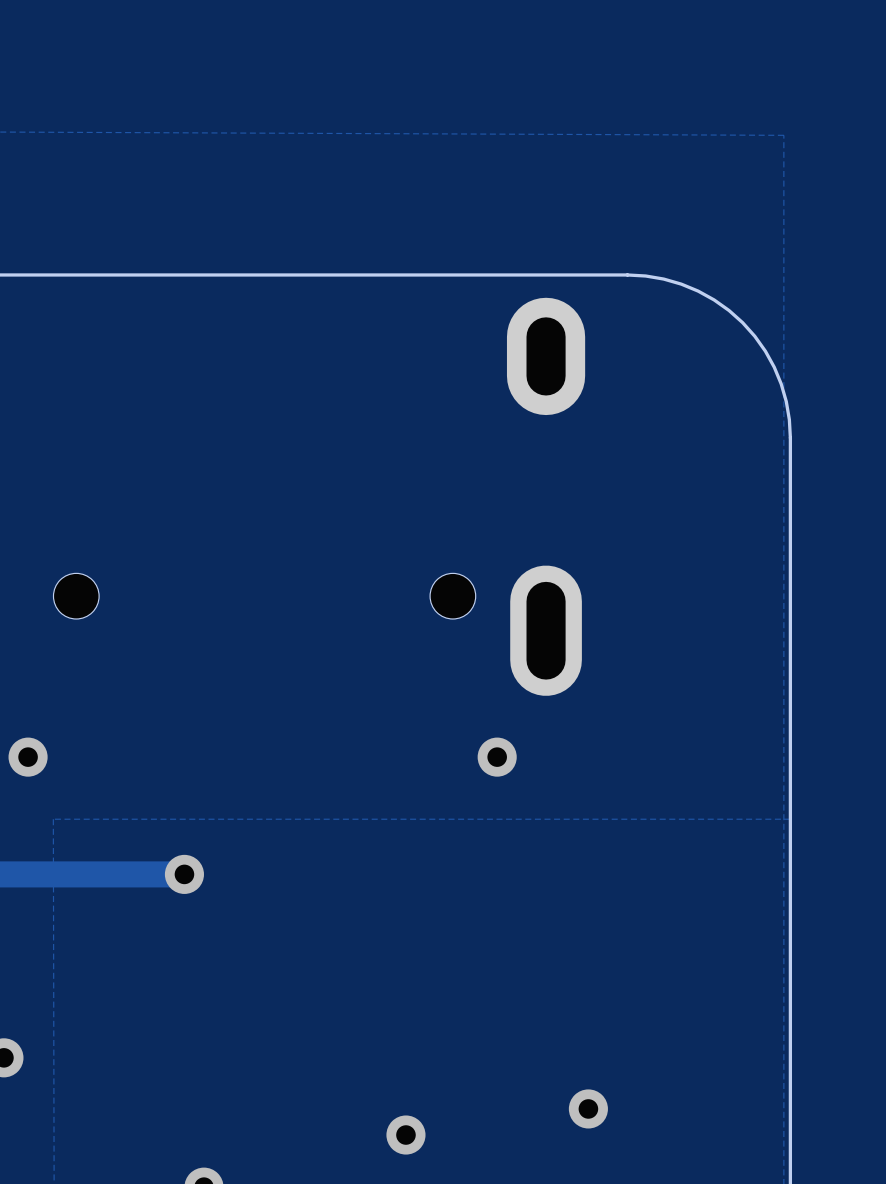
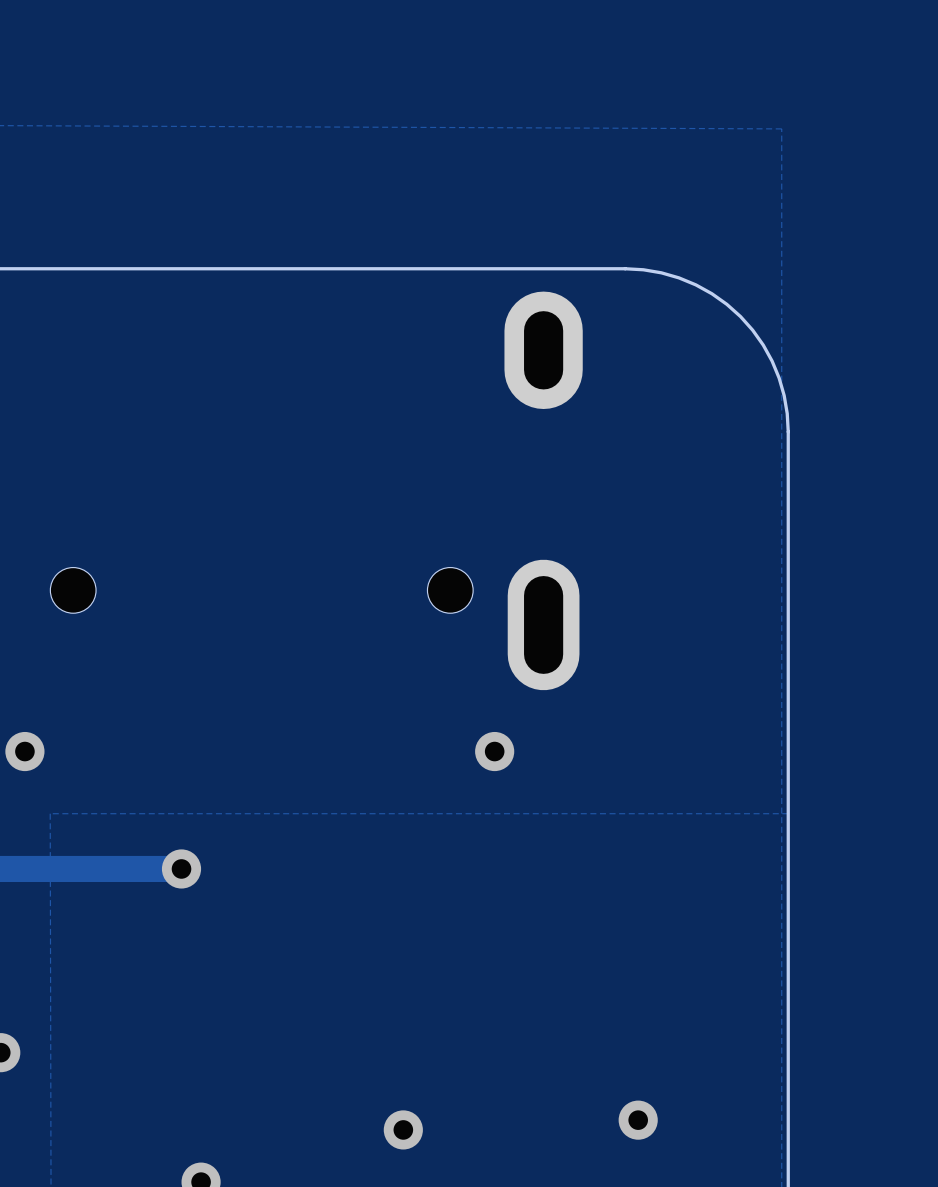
via position: (588, 1108) -> (638, 1120)

